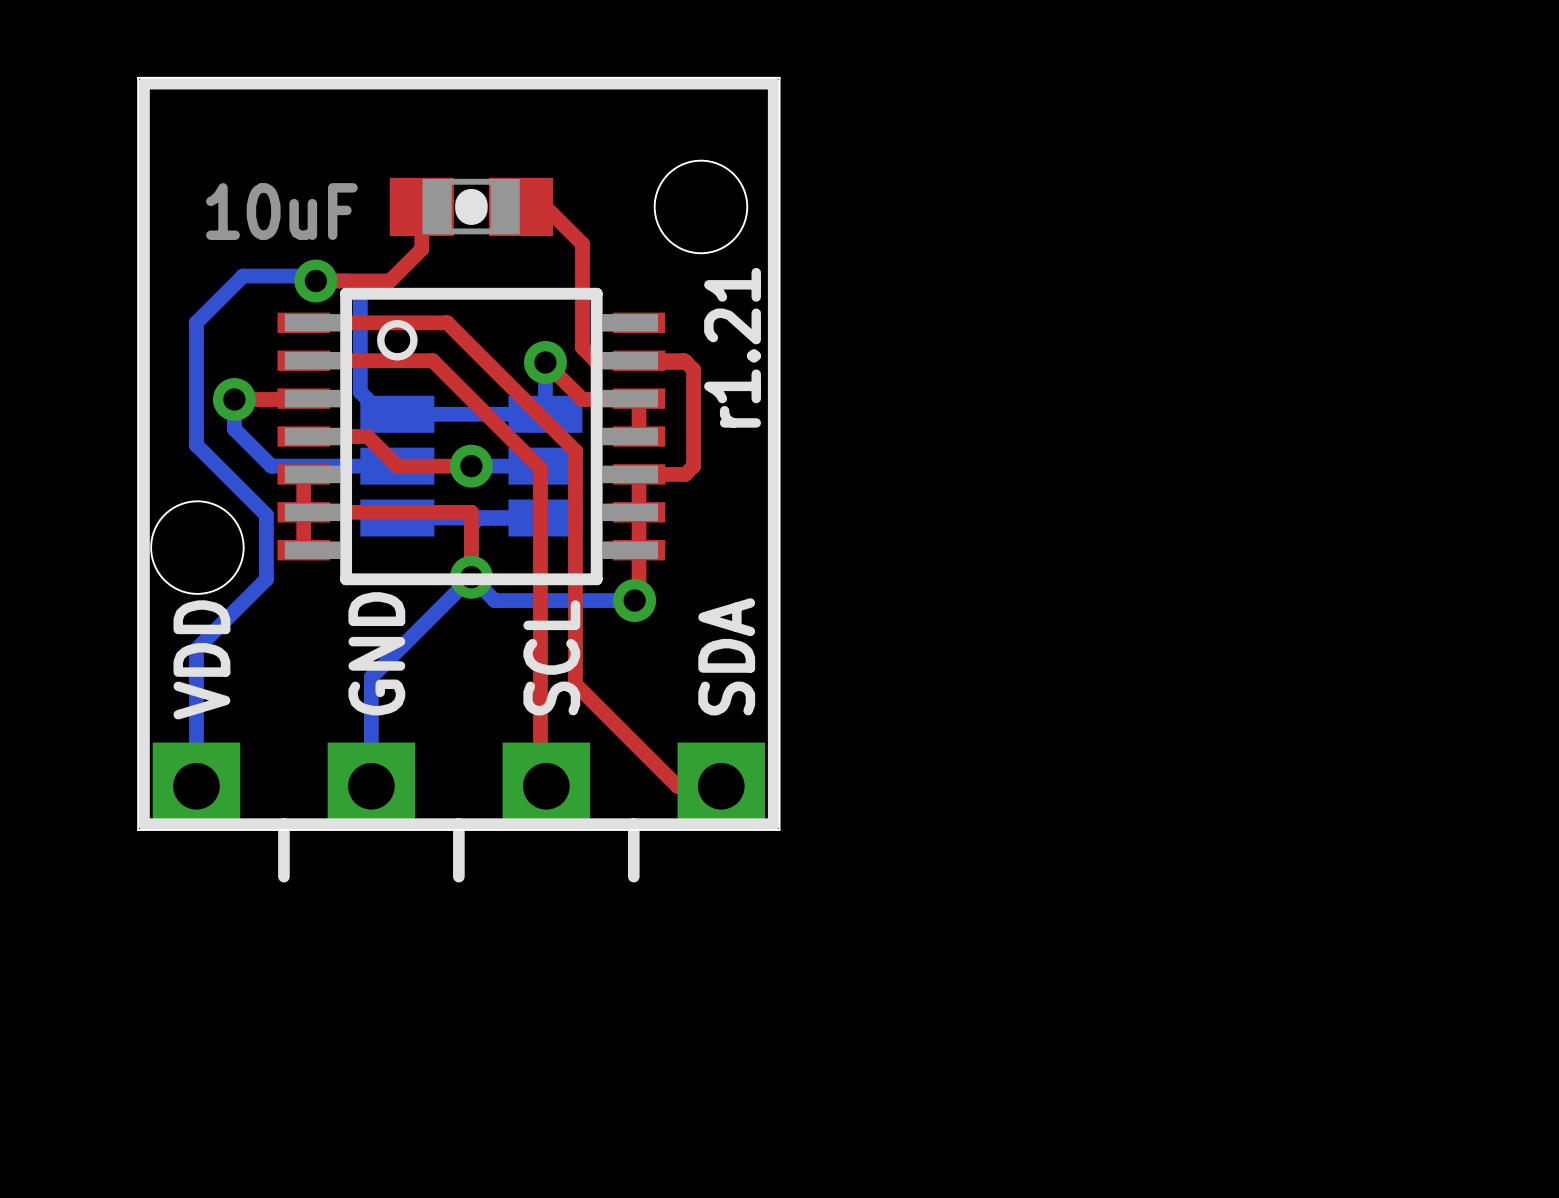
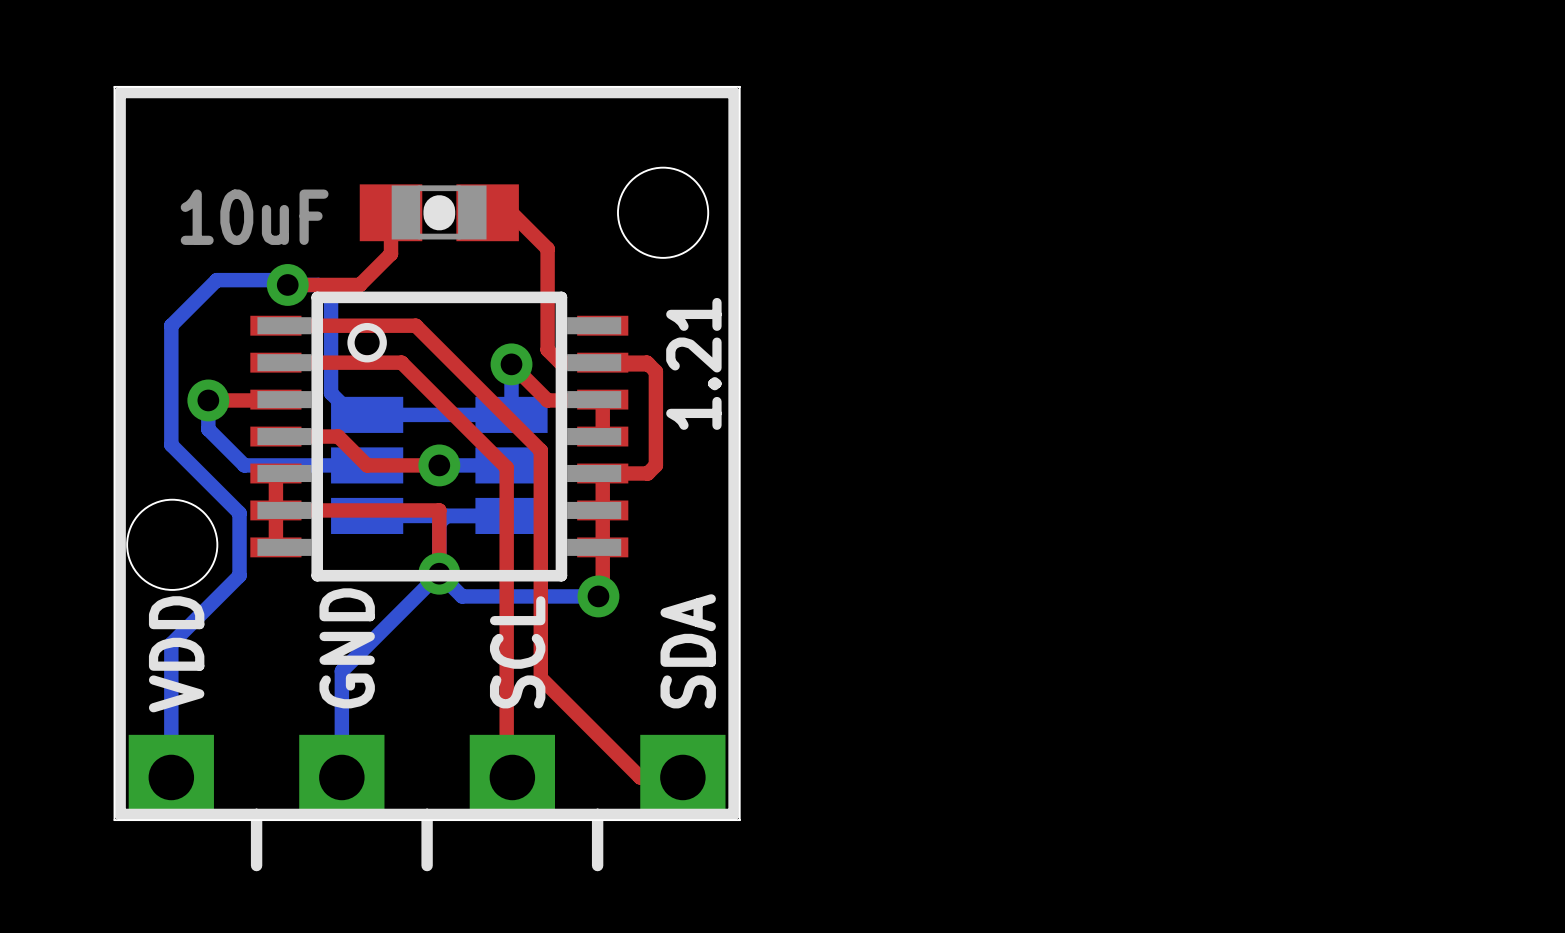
text: r1.21 (732, 347) -> 1.21 (693, 363)

